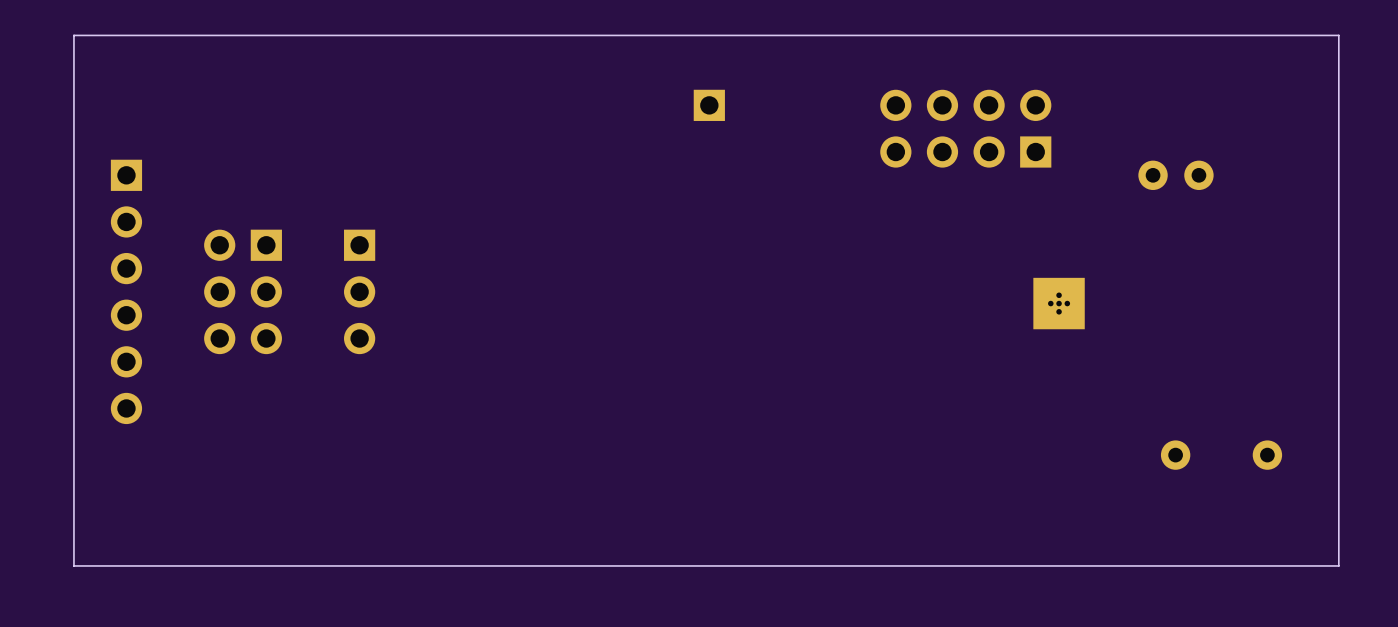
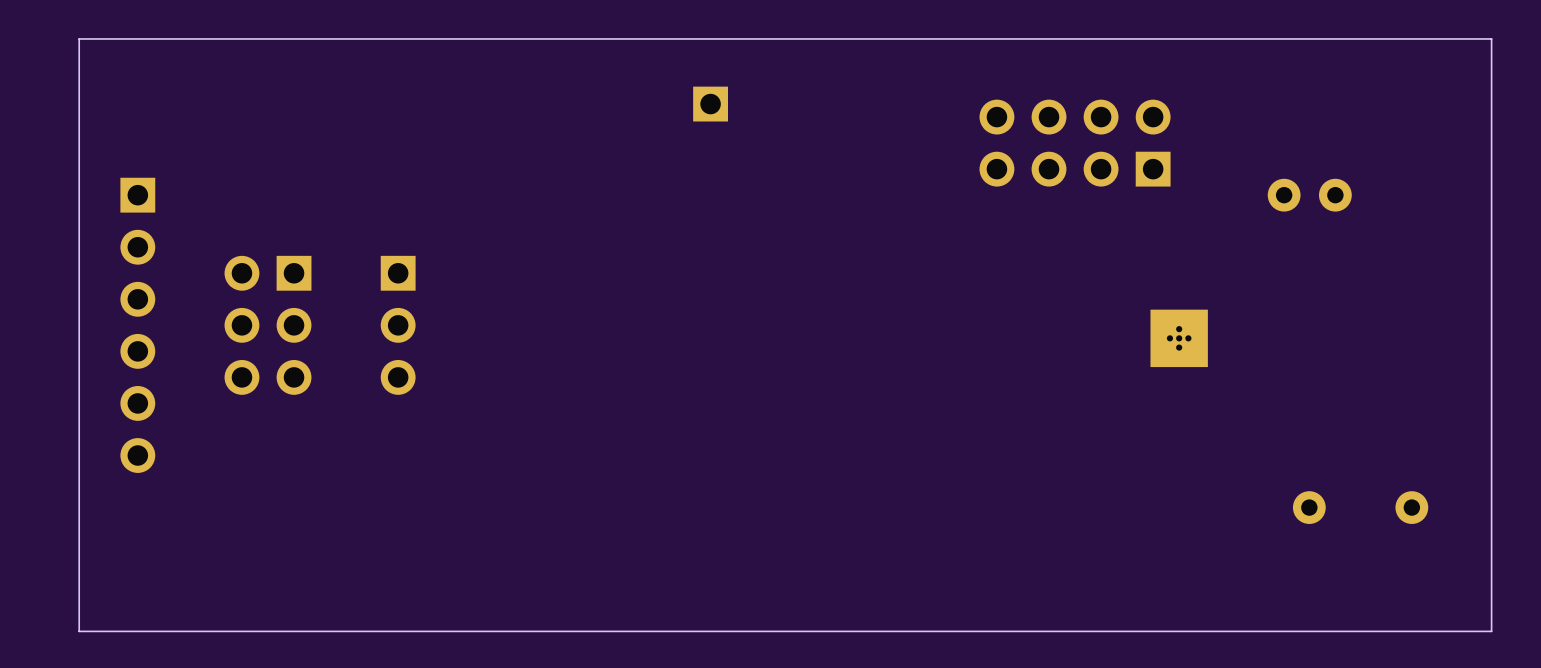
part position: (709, 105) -> (710, 104)

